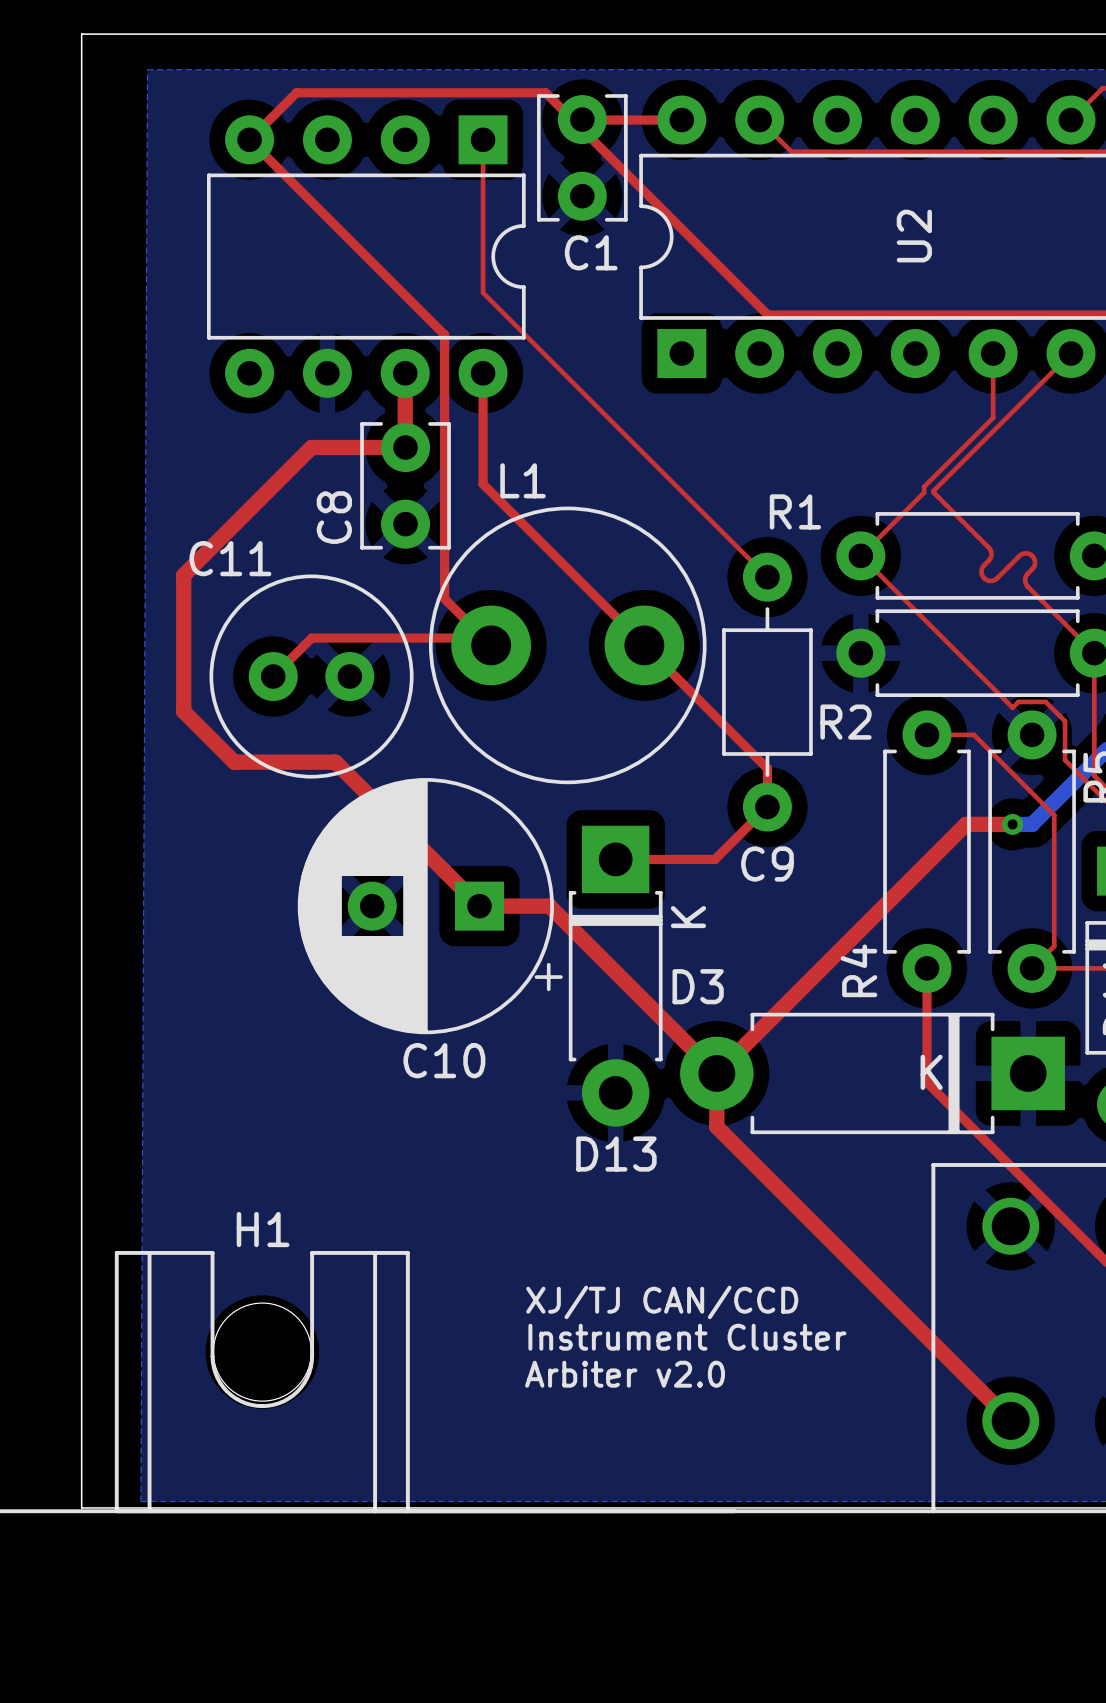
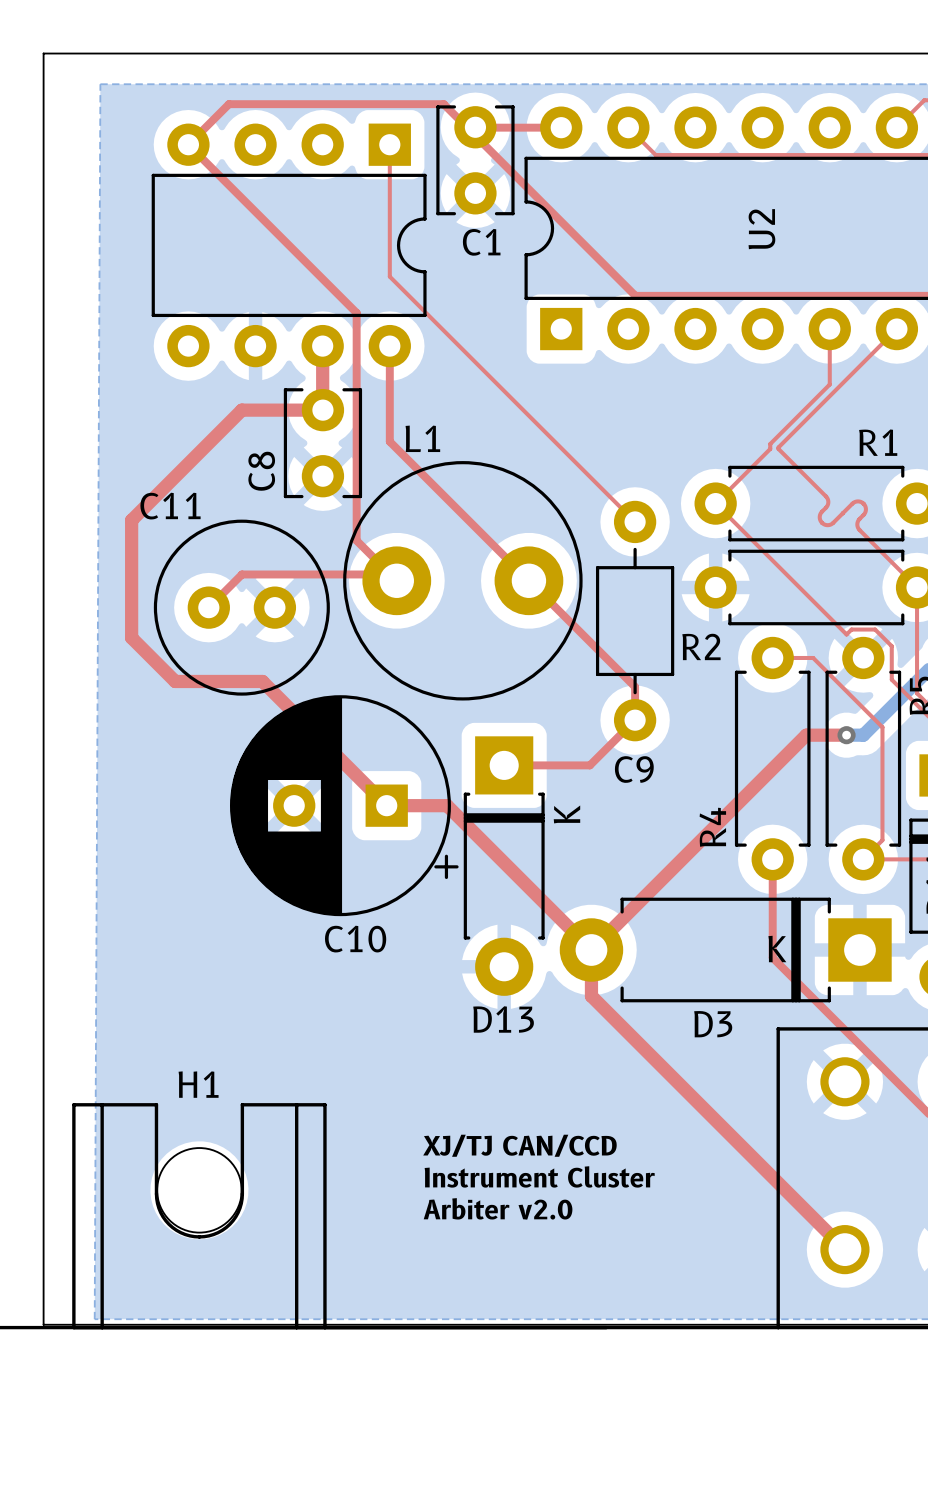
R1 name position: R1 (795, 511) -> R1 (878, 442)
R4 name position: R4 (858, 970) -> R4 (712, 827)
D3 name position: D3 (698, 986) -> D3 (713, 1024)

